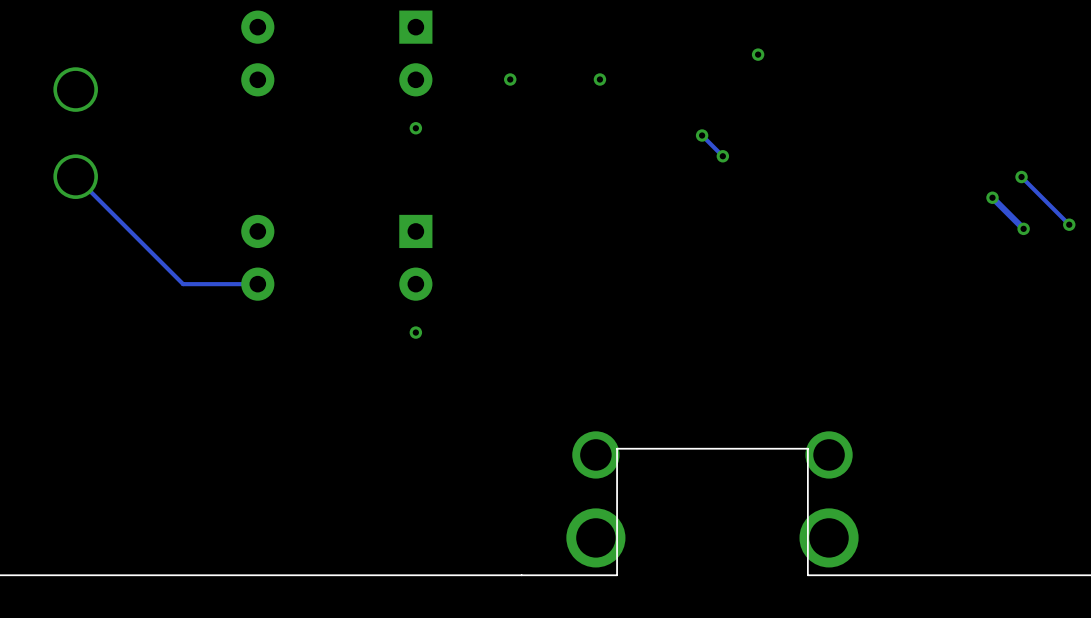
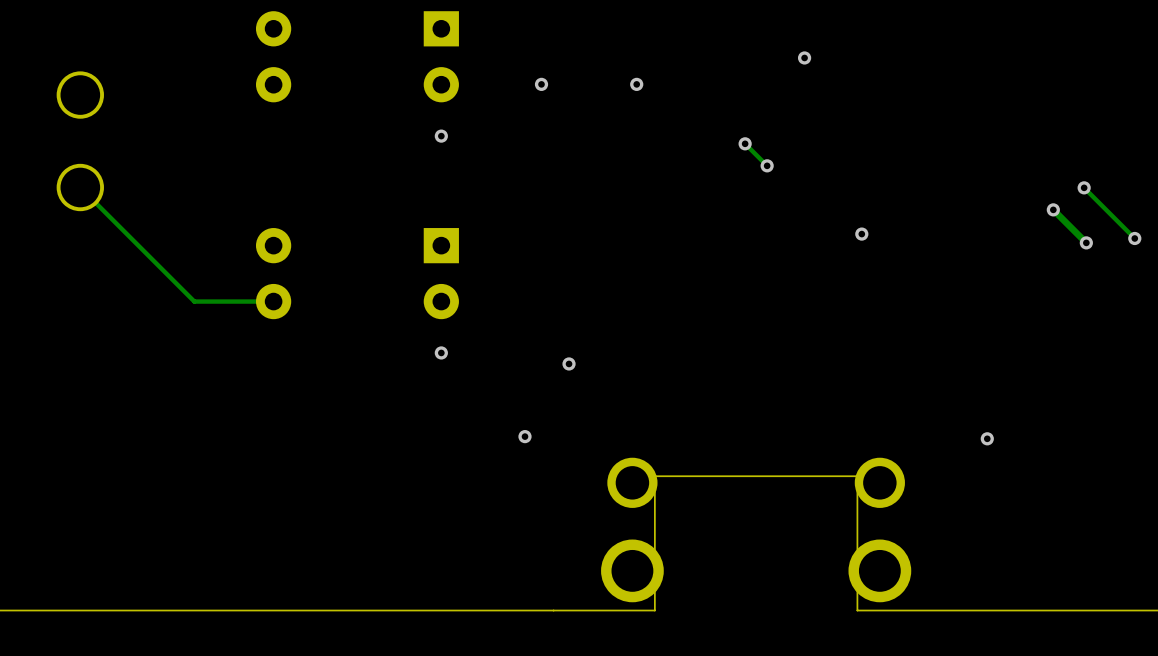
via: none -> (861, 234)
via: none -> (569, 363)
via: none -> (525, 436)
via: none -> (987, 438)

